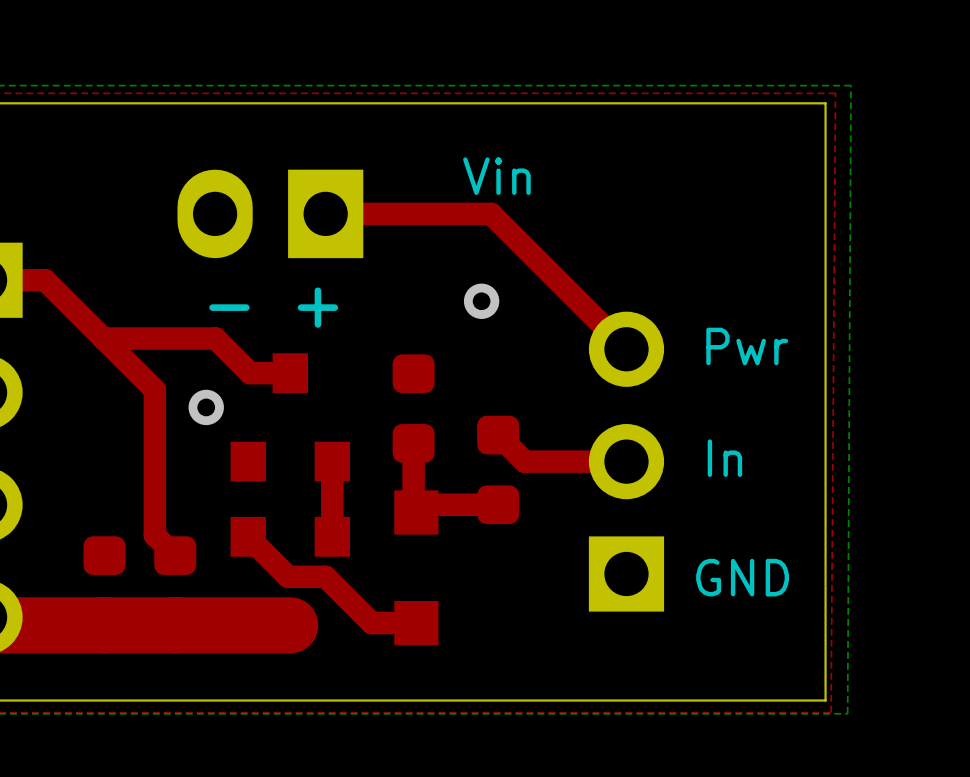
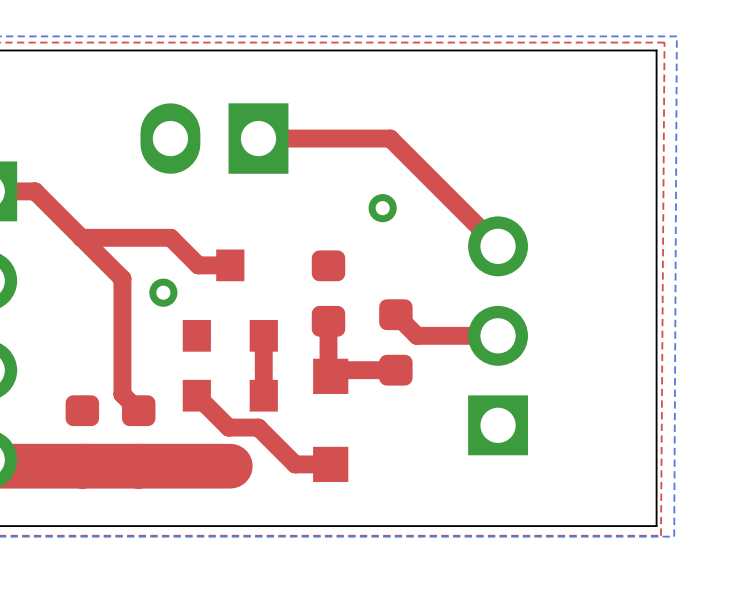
text: Vin (496, 176) -> none
text: + - (273, 307) -> none
text: Pwr (747, 346) -> none
text: In (724, 458) -> none
text: GND (742, 577) -> none

